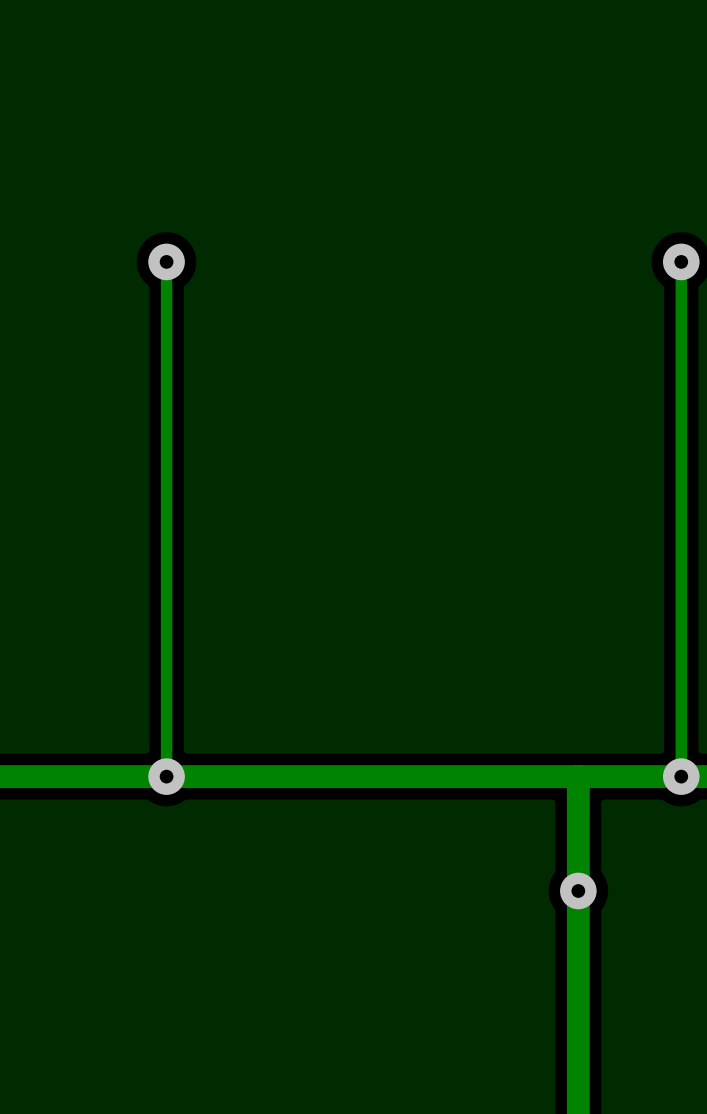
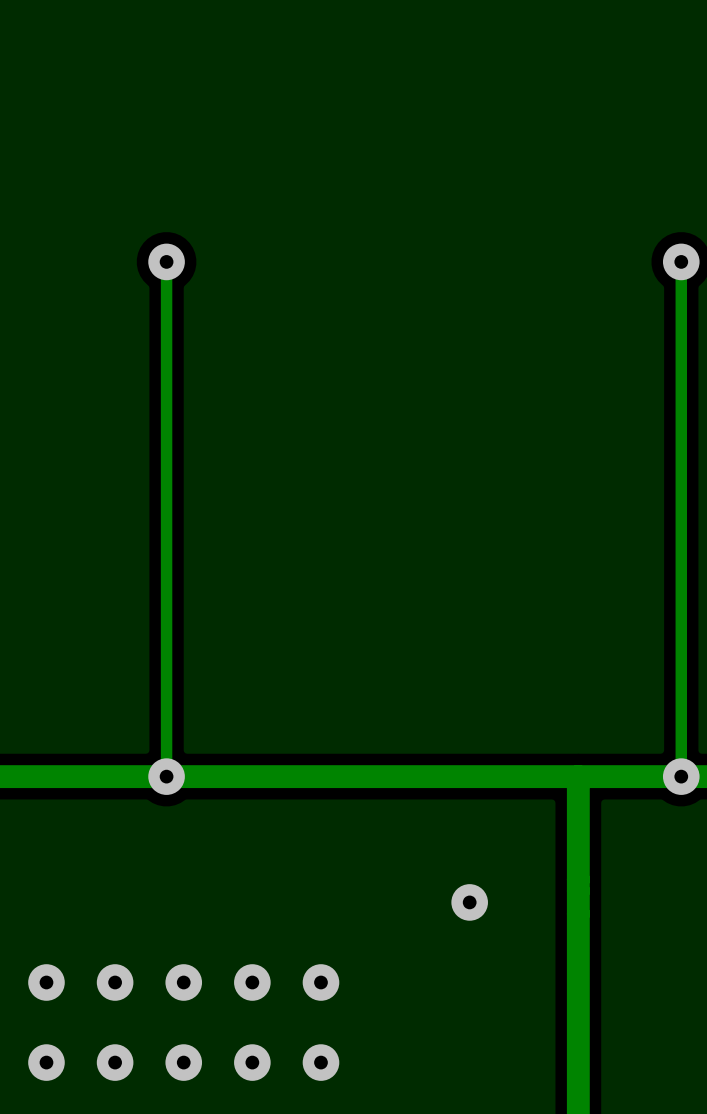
via position: (578, 890) -> (469, 902)
via: none -> (46, 982)
via: none -> (115, 982)
via: none -> (183, 982)
via: none -> (252, 982)
via: none -> (320, 982)
via: none -> (46, 1062)
via: none -> (115, 1062)
via: none -> (183, 1062)
via: none -> (252, 1062)
via: none -> (320, 1062)

